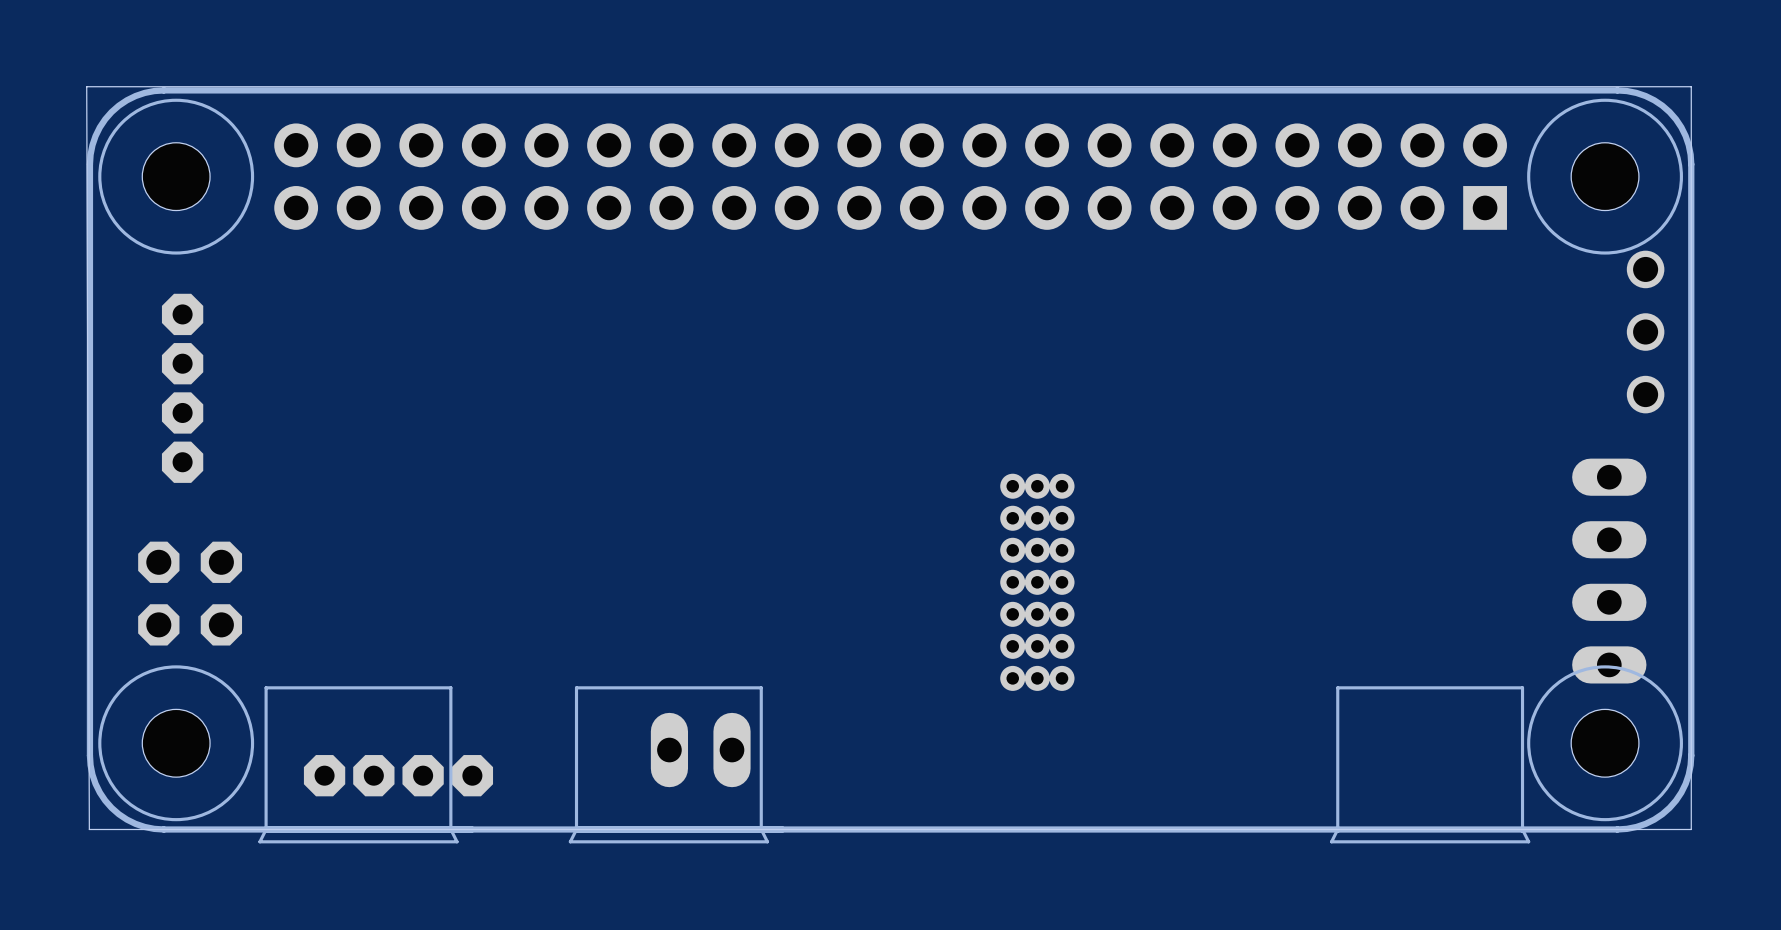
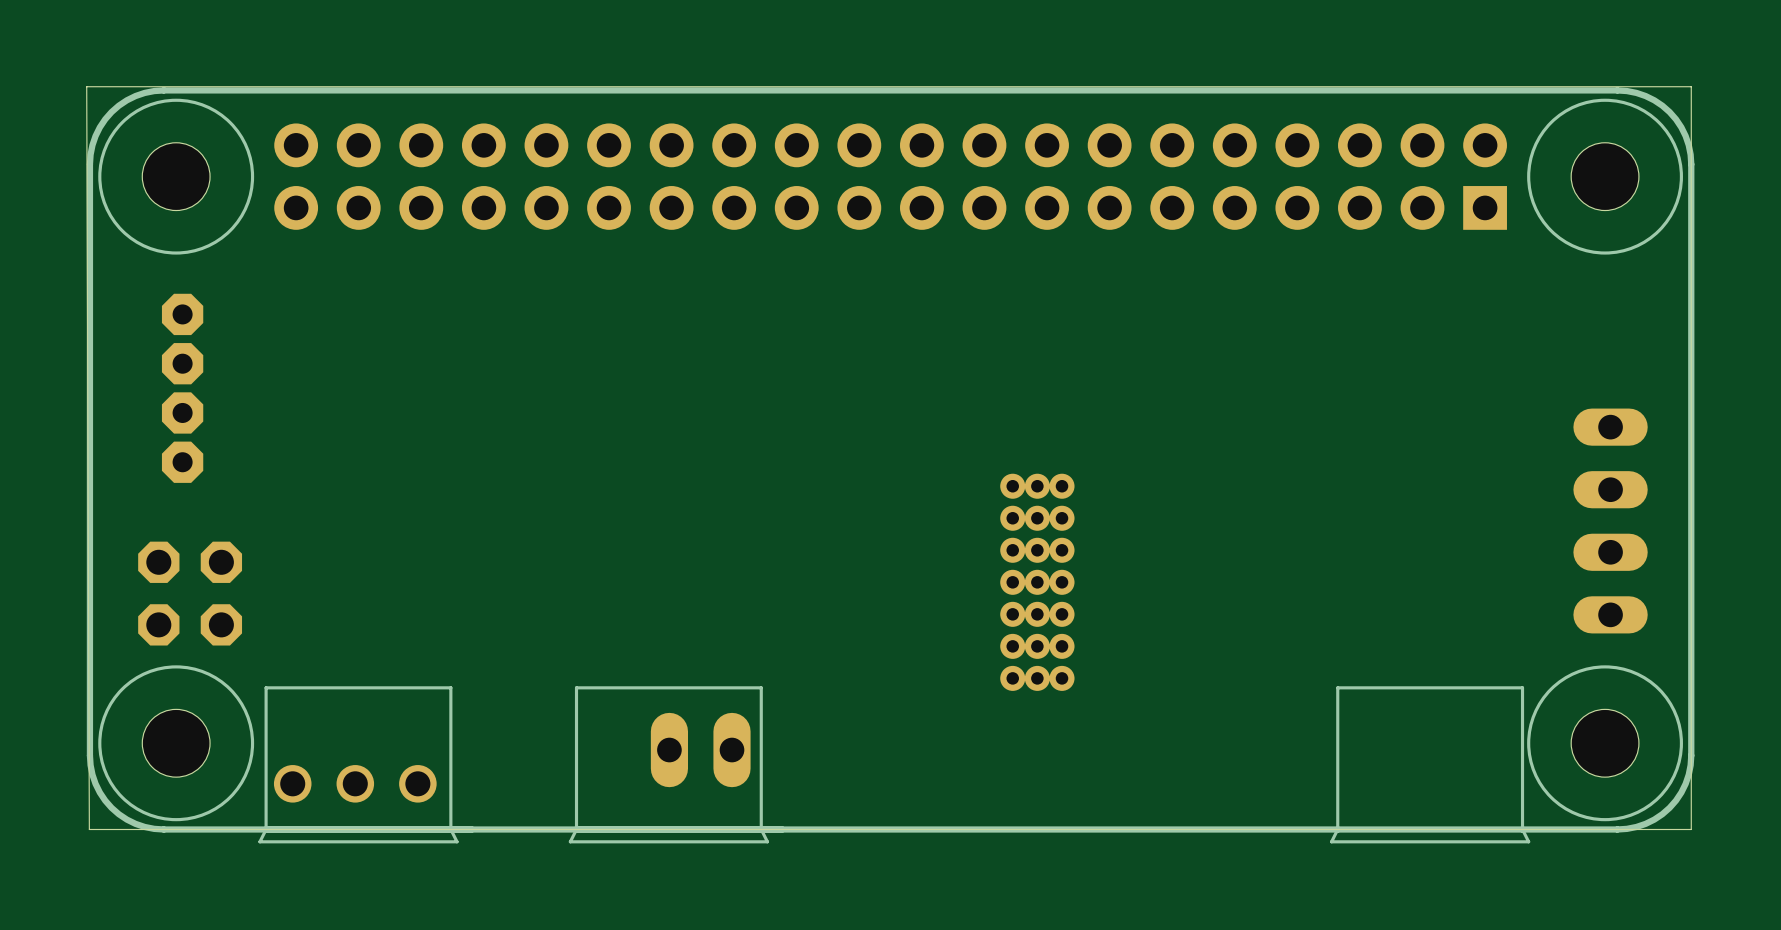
part: (1645, 332) -> none
part position: (1609, 571) -> (1610, 520)
part: (398, 775) -> none
part: none -> (355, 783)

